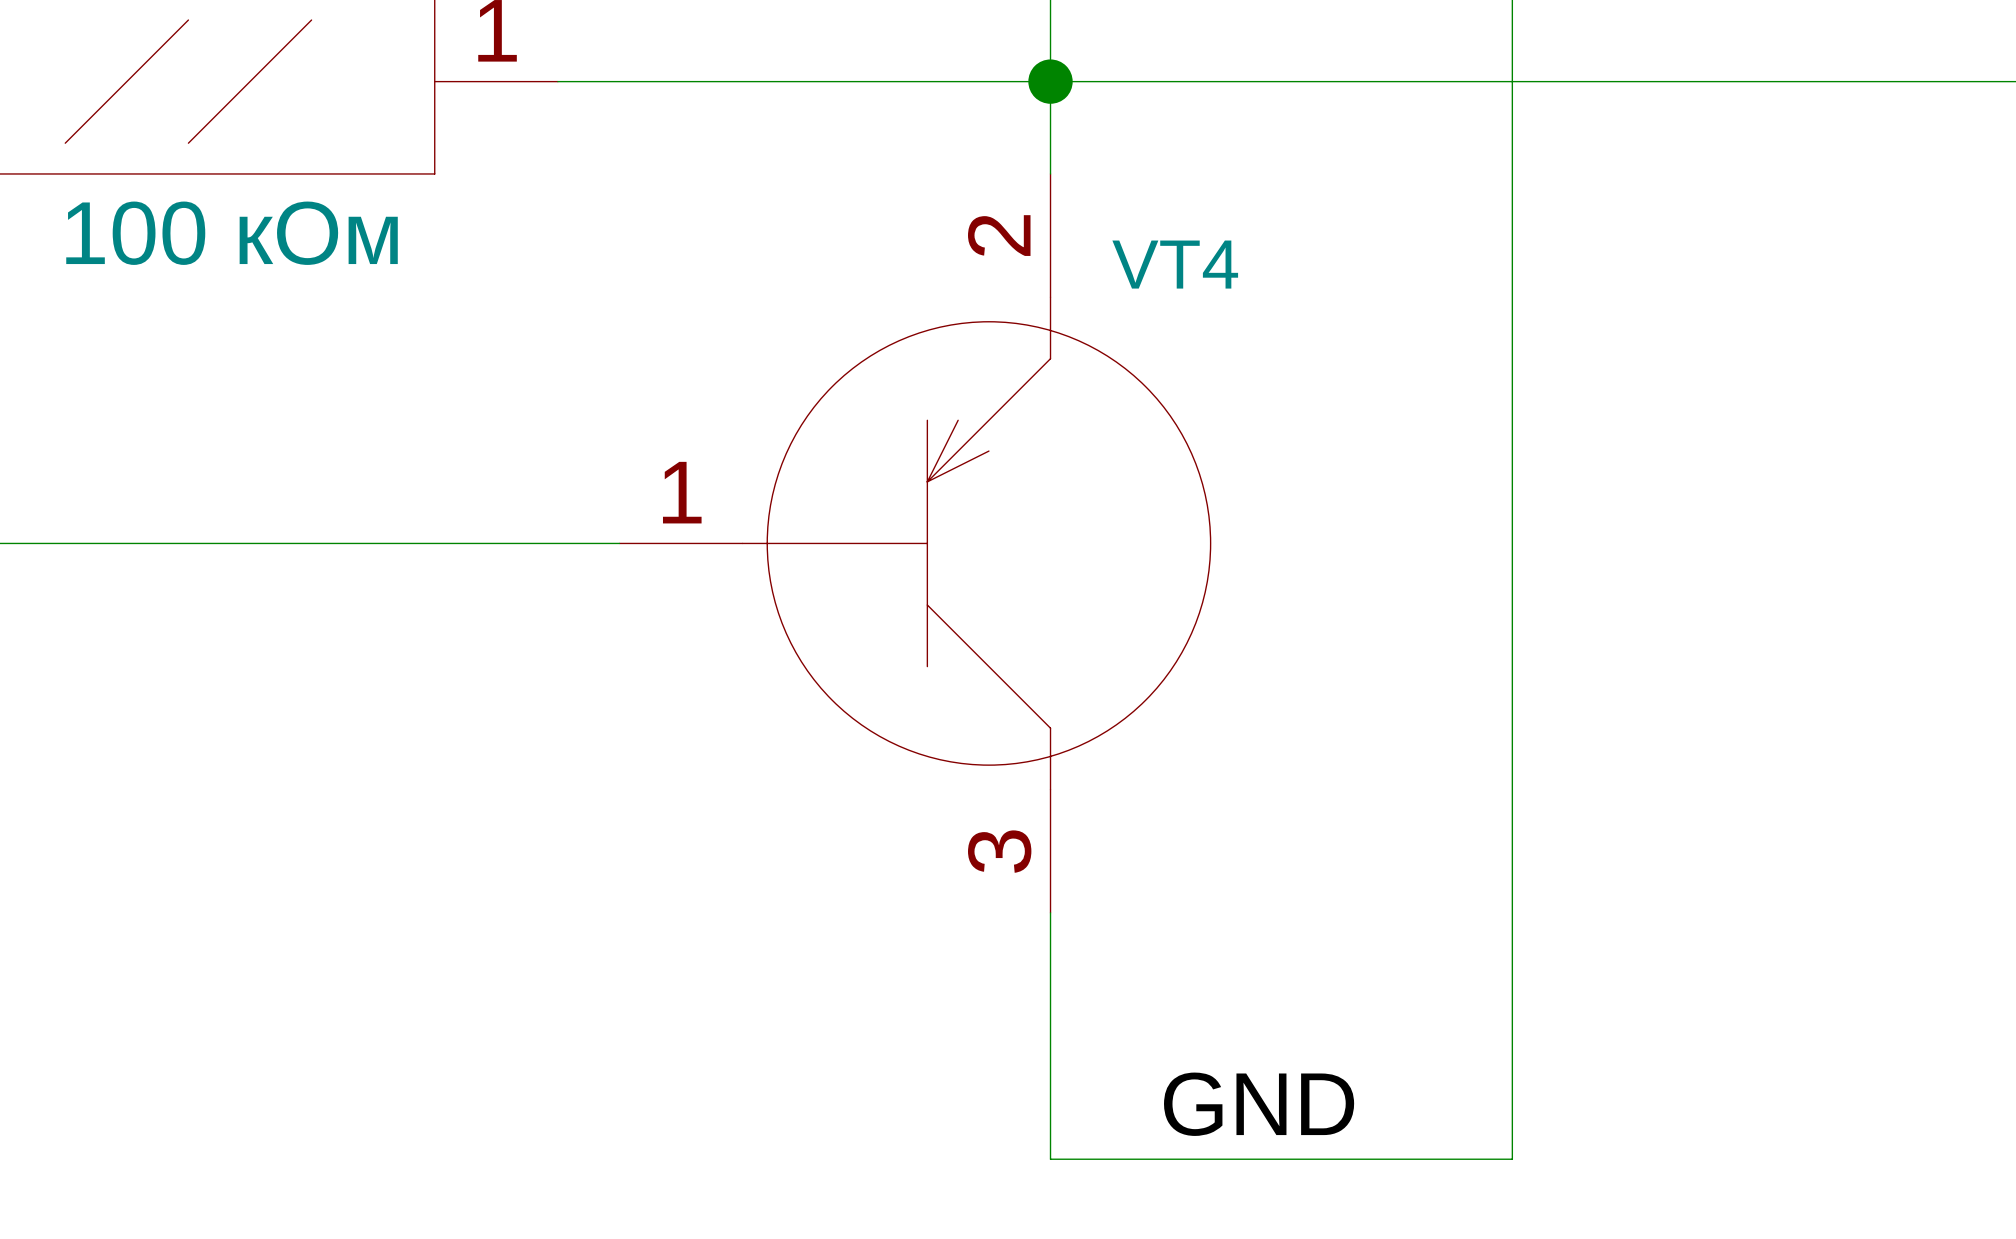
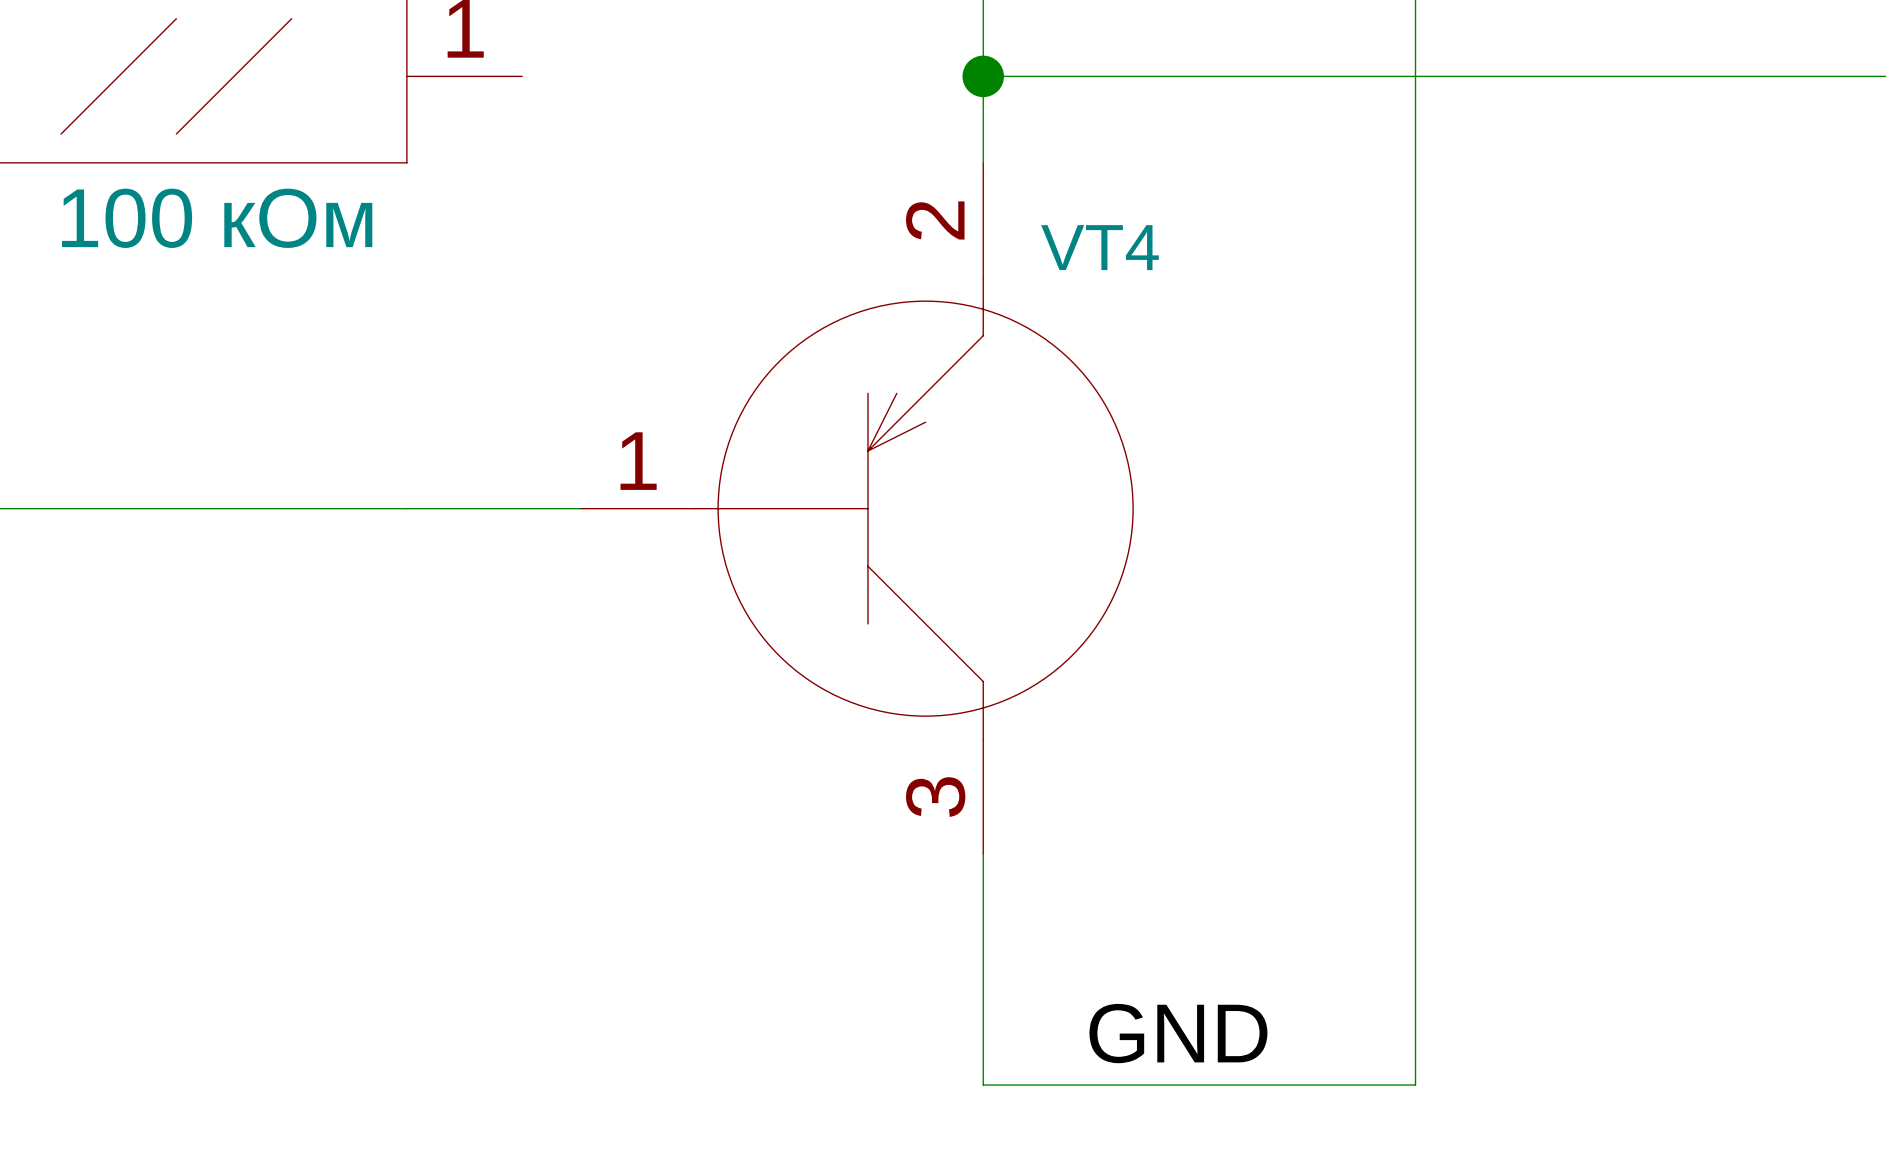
wire: (557, 81) (1050, 81) -> none

